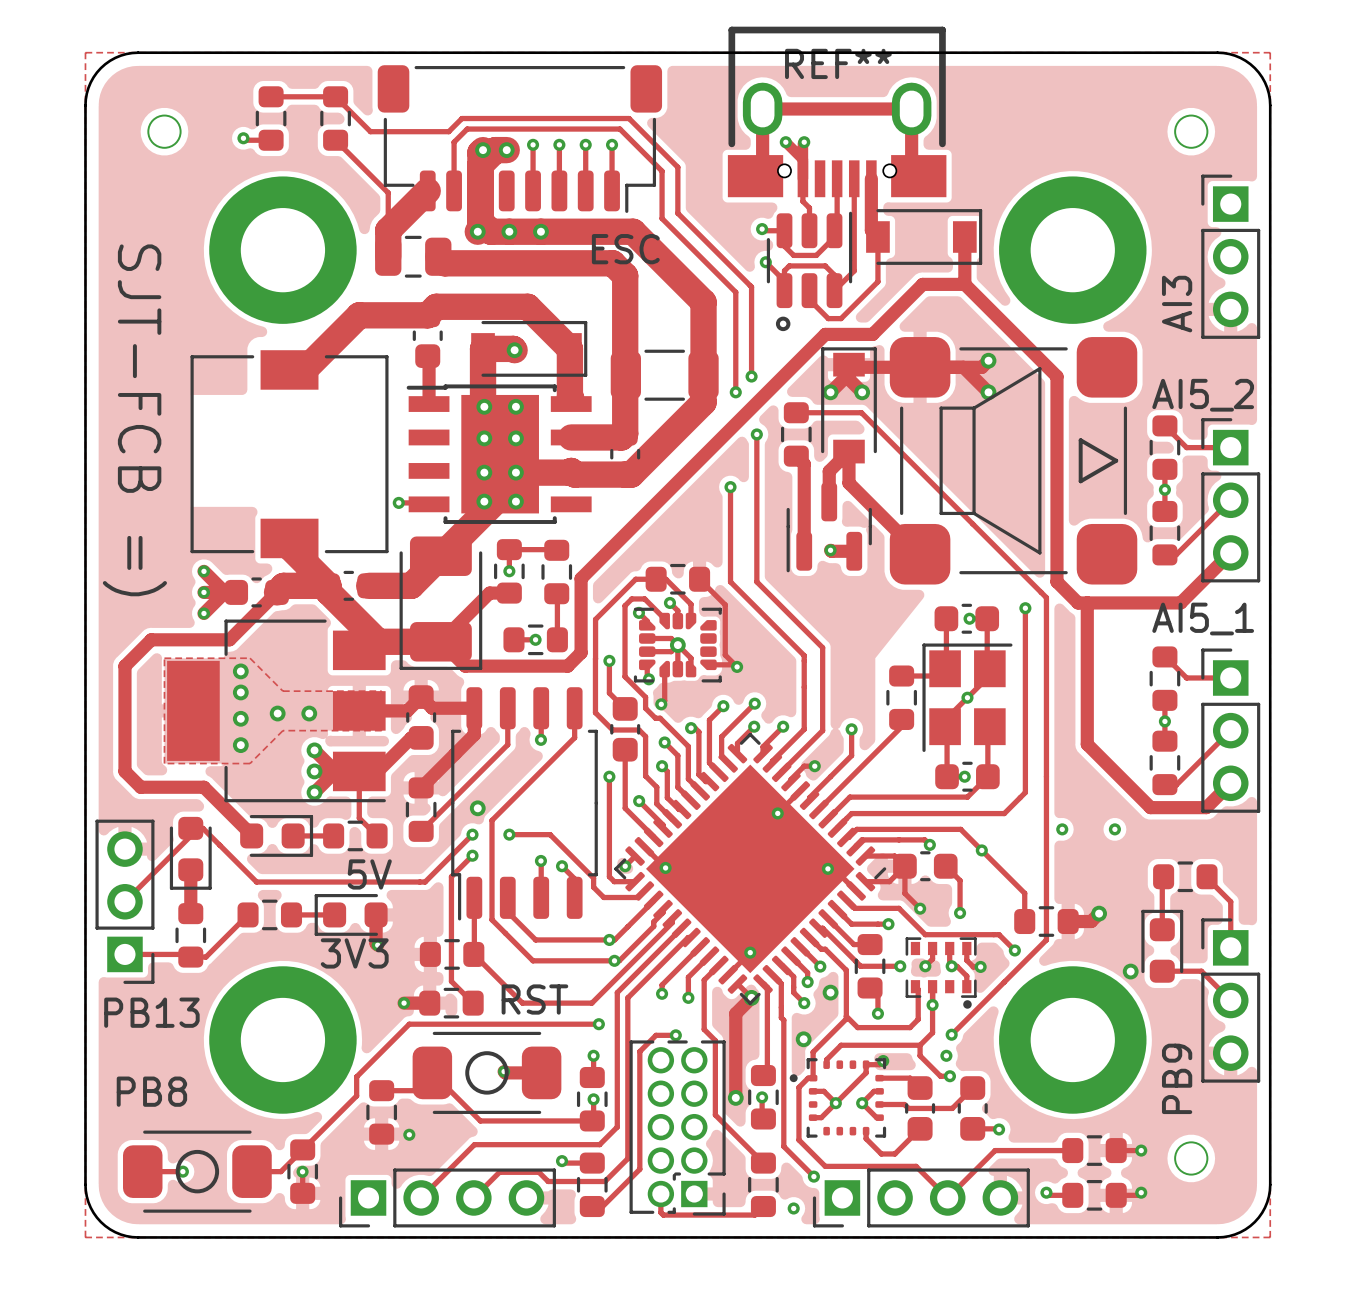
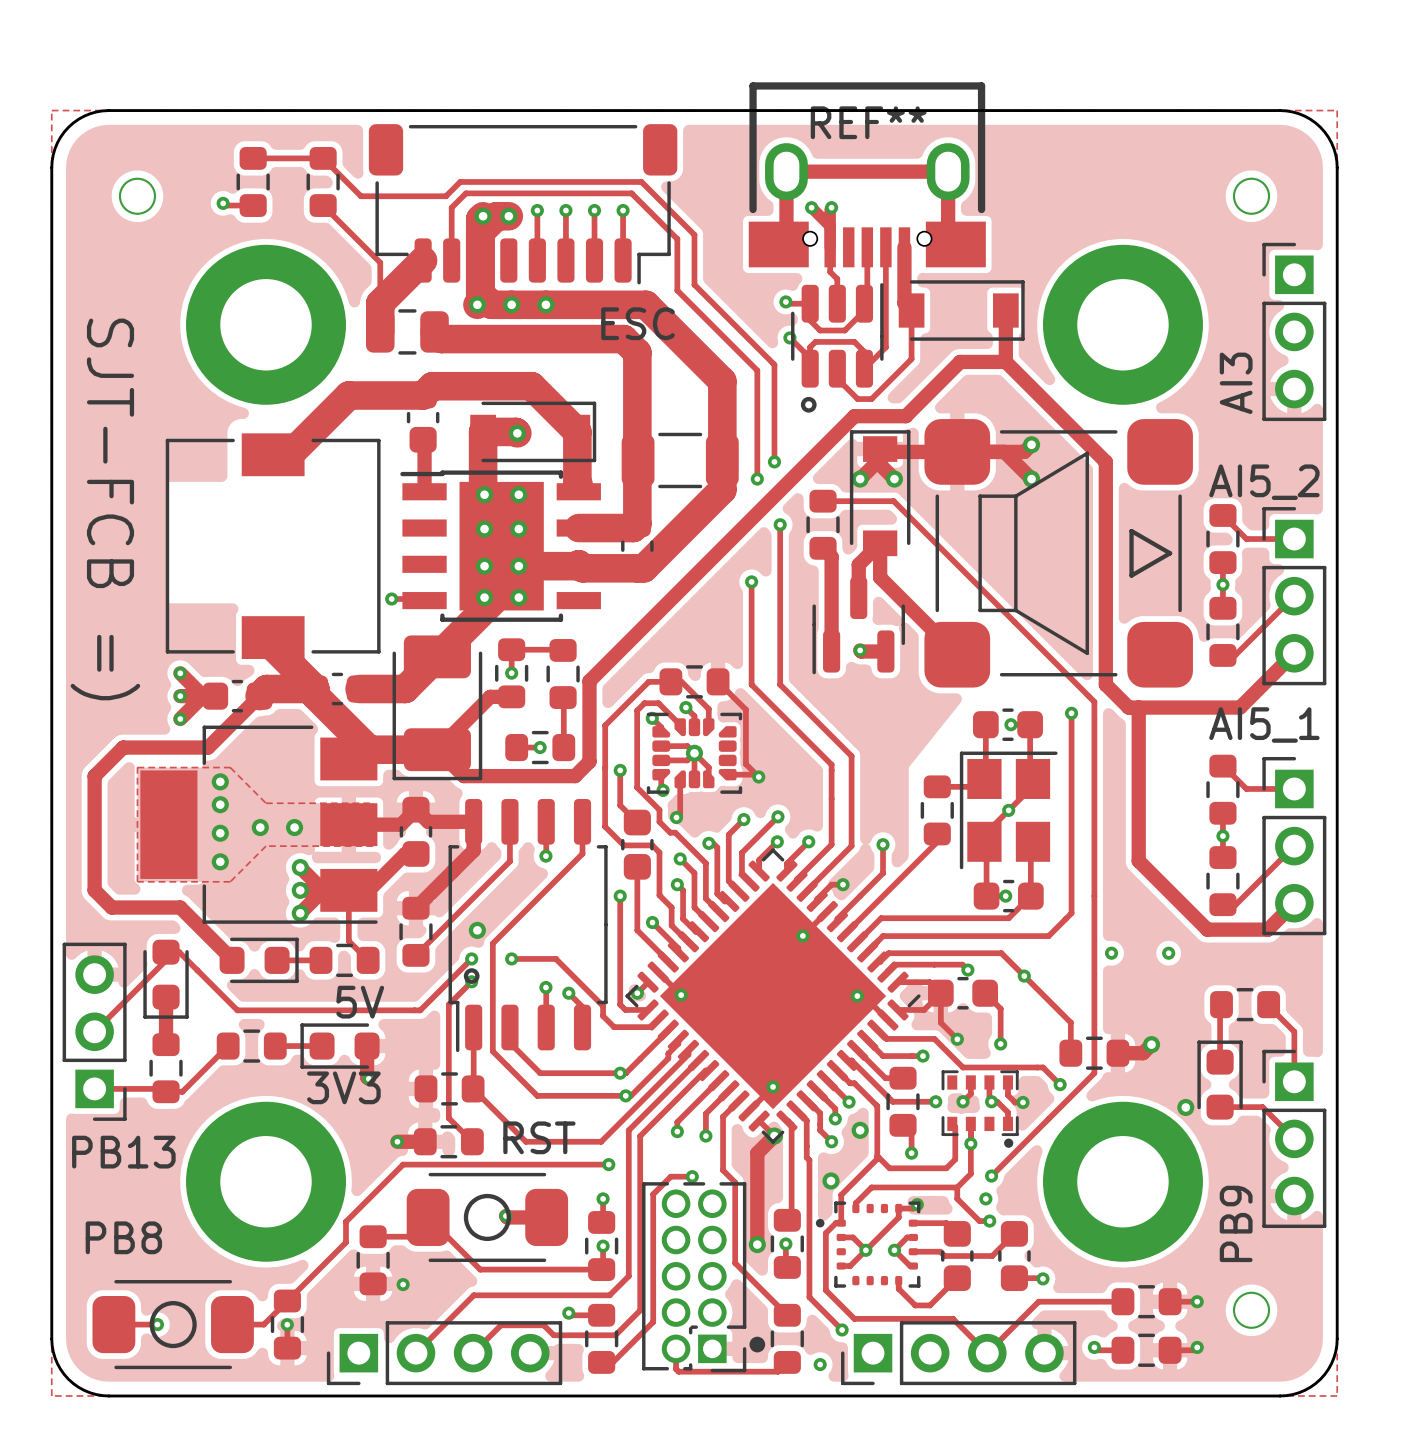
drawing: none -> [463, 968, 480, 984]
drawing: none -> [749, 1336, 766, 1353]

